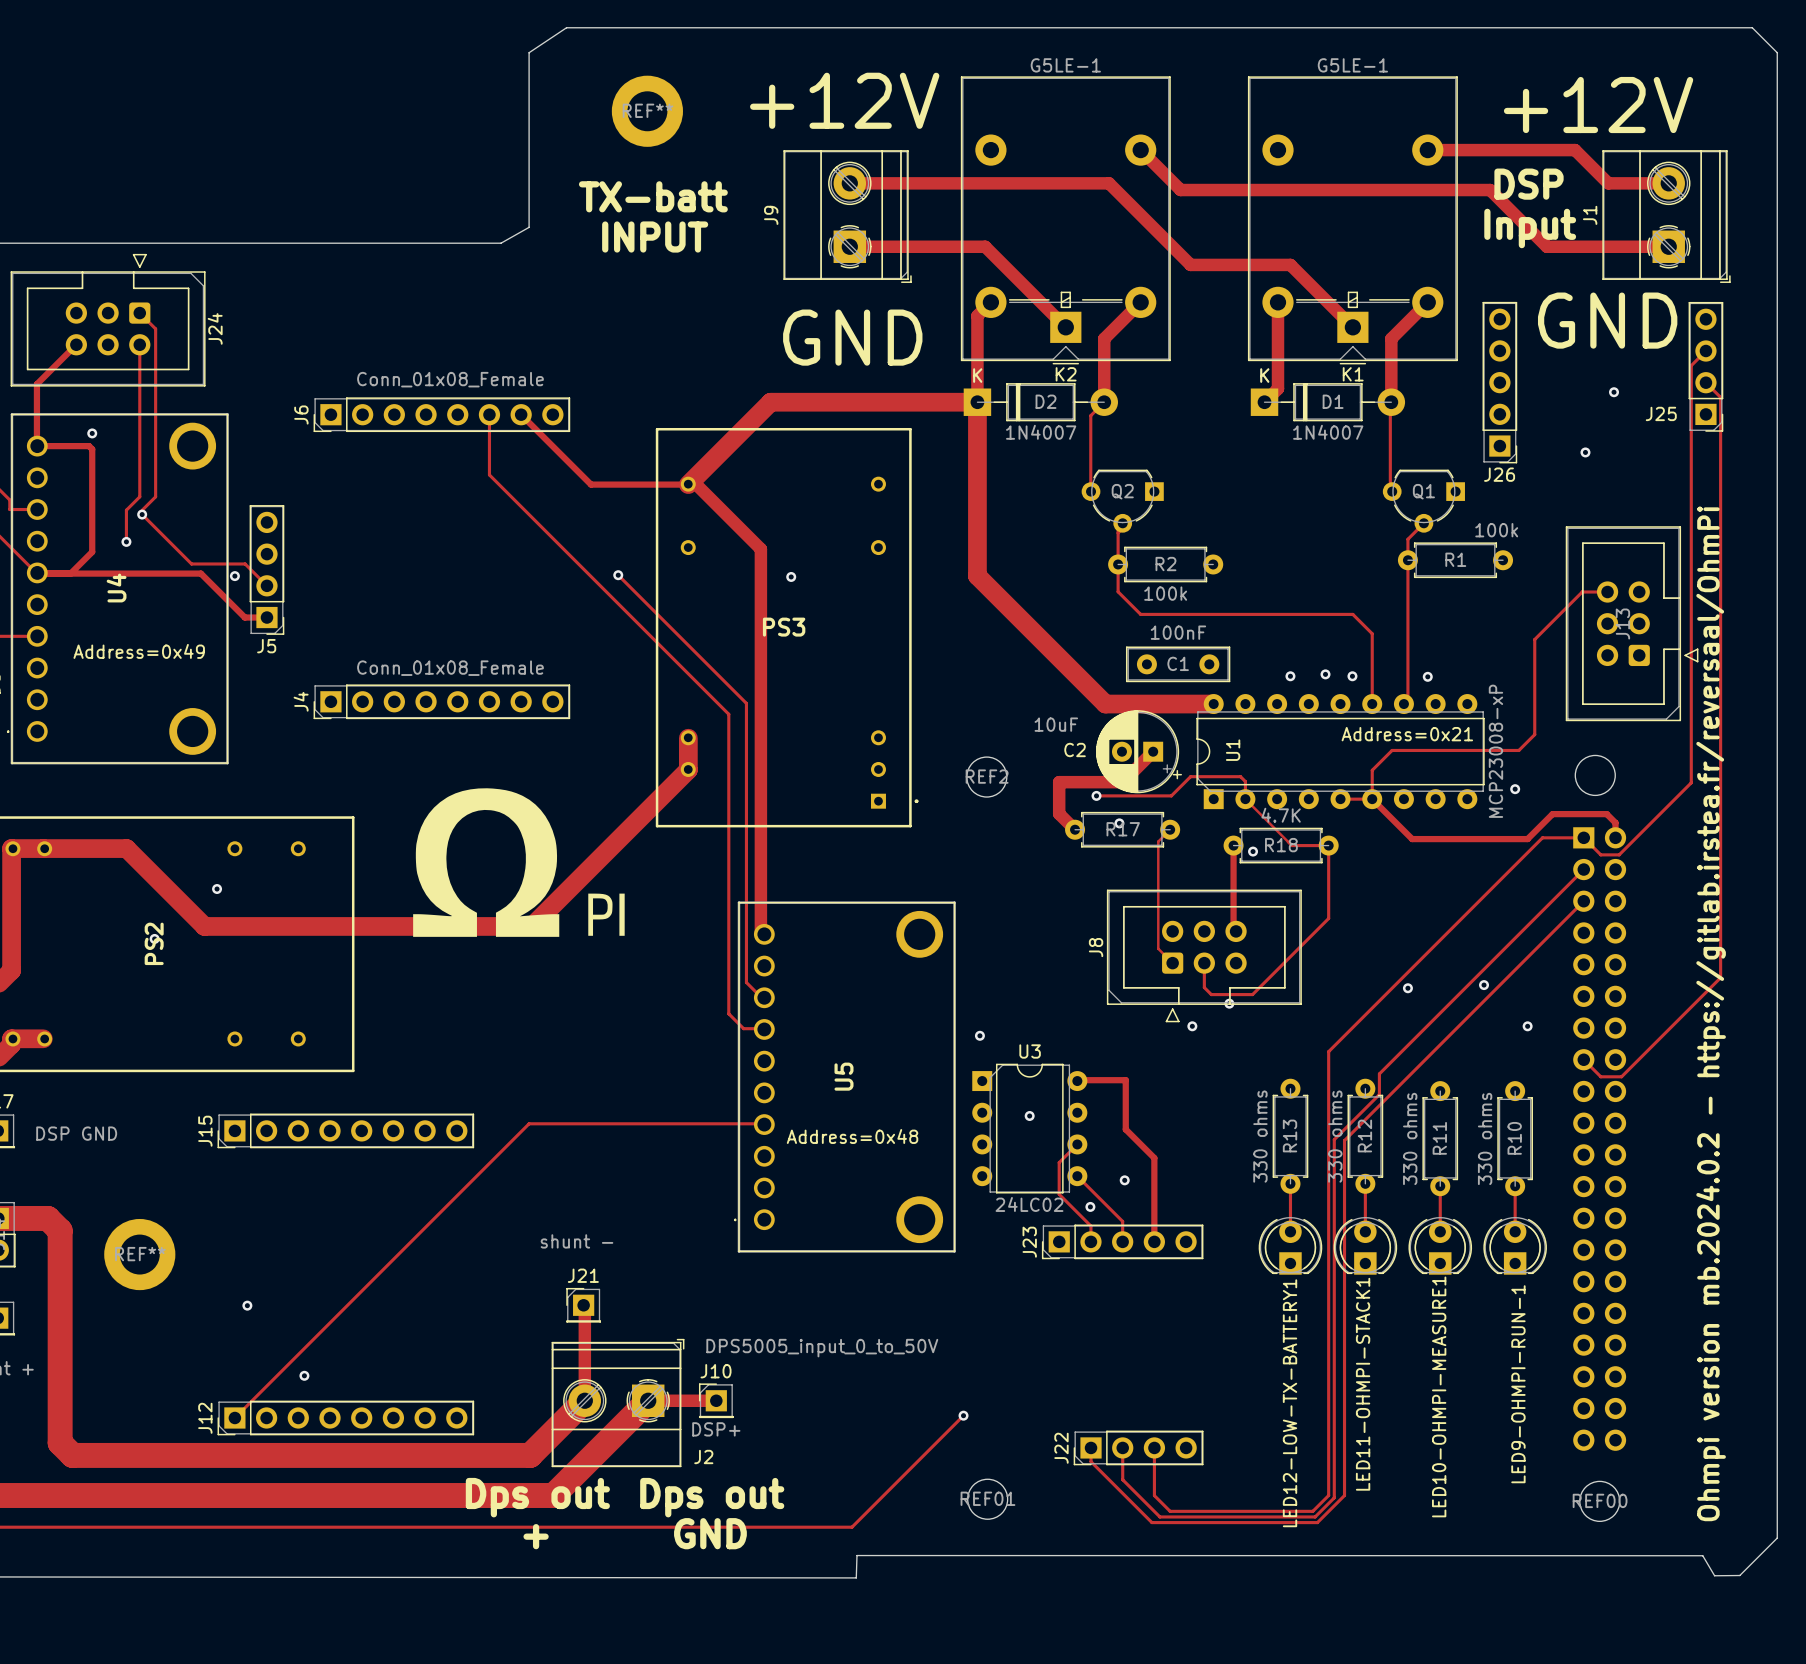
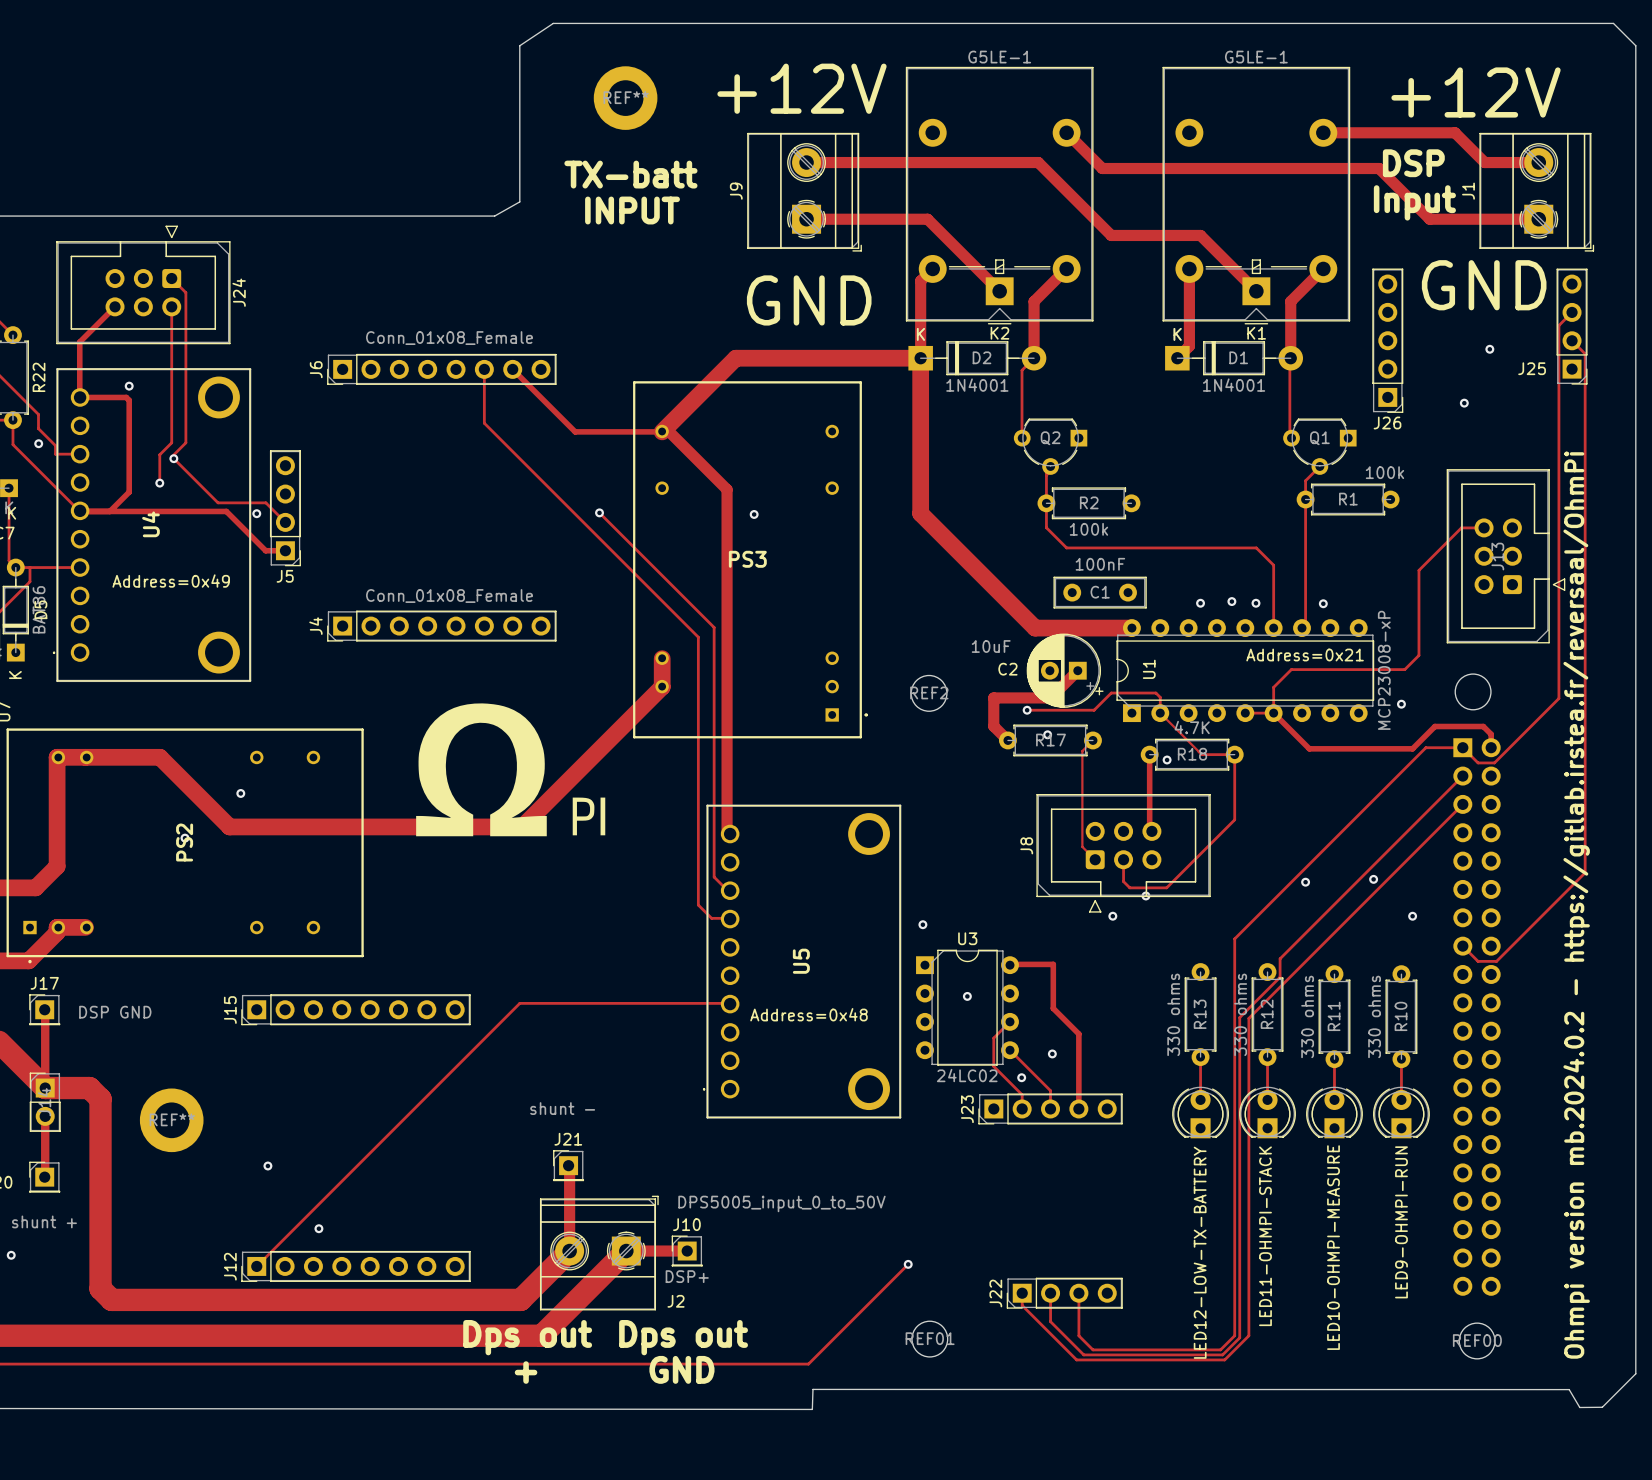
D2 value: 1N4007 (1041, 432) -> 1N4001 (977, 385)
D1 value: 1N4007 (1328, 432) -> 1N4001 (1234, 385)
LED11-OHMPI-STACK1 name: LED11-OHMPI-STACK1 (1363, 1384) -> LED11-OHMPI-STACK (1265, 1236)
LED9-OHMPI-RUN-1 name: LED9-OHMPI-RUN-1 (1518, 1384) -> LED9-OHMPI-RUN (1401, 1222)
LED10-OHMPI-MEASURE1 name: LED10-OHMPI-MEASURE1 (1439, 1396) -> LED10-OHMPI-MEASURE (1333, 1247)
LED12-LOW-TX-BATTERY1 name: LED12-LOW-TX-BATTERY1 (1290, 1403) -> LED12-LOW-TX-BATTERY (1200, 1252)

